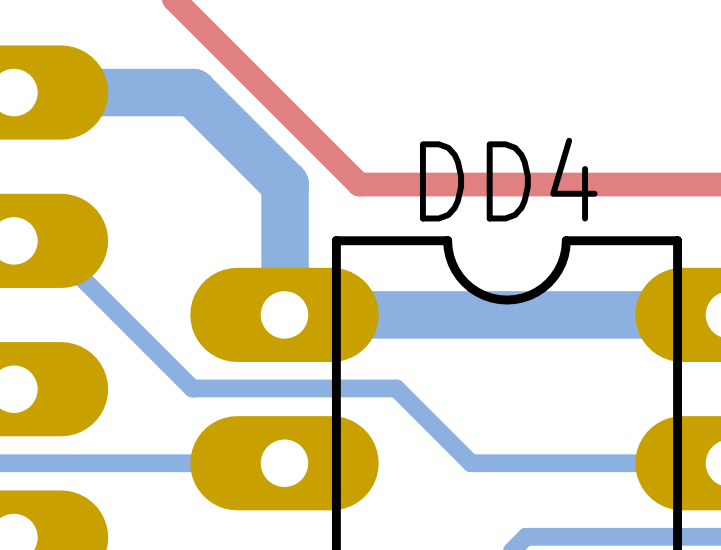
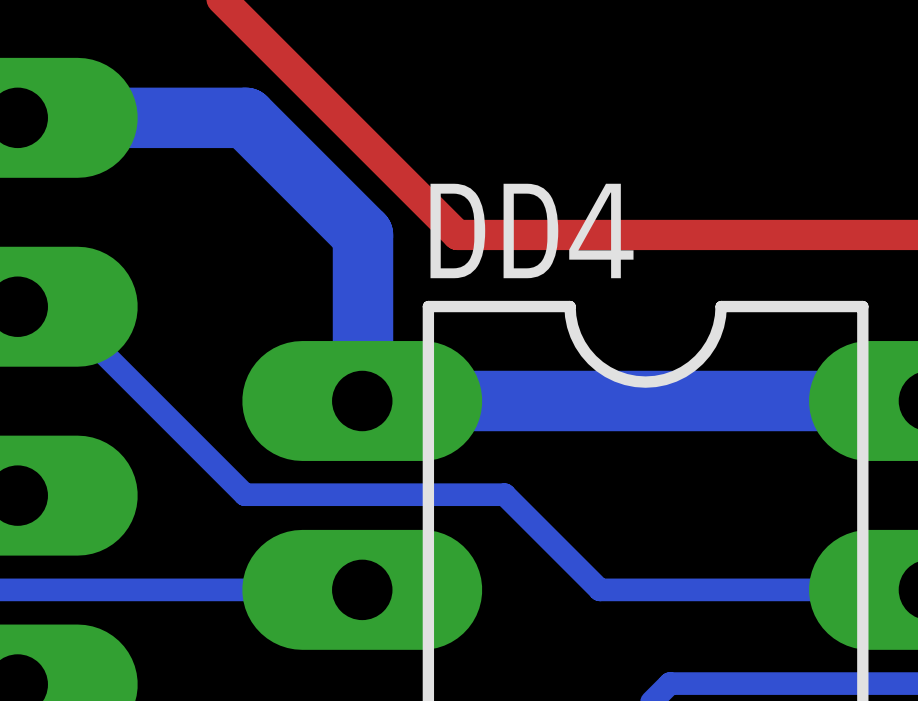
DD4 name position: DD4 (508, 179) -> DD4 (532, 230)

